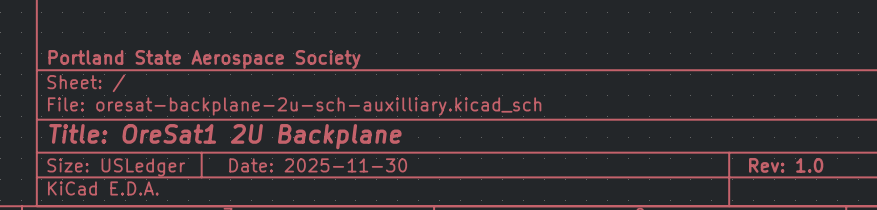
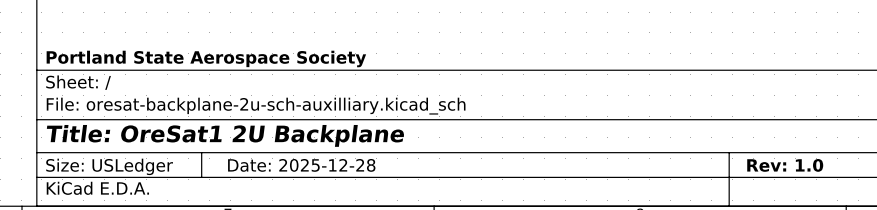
title block: Date: 2025-11-30 (318, 165) -> Date: 2025-12-28 (301, 165)

